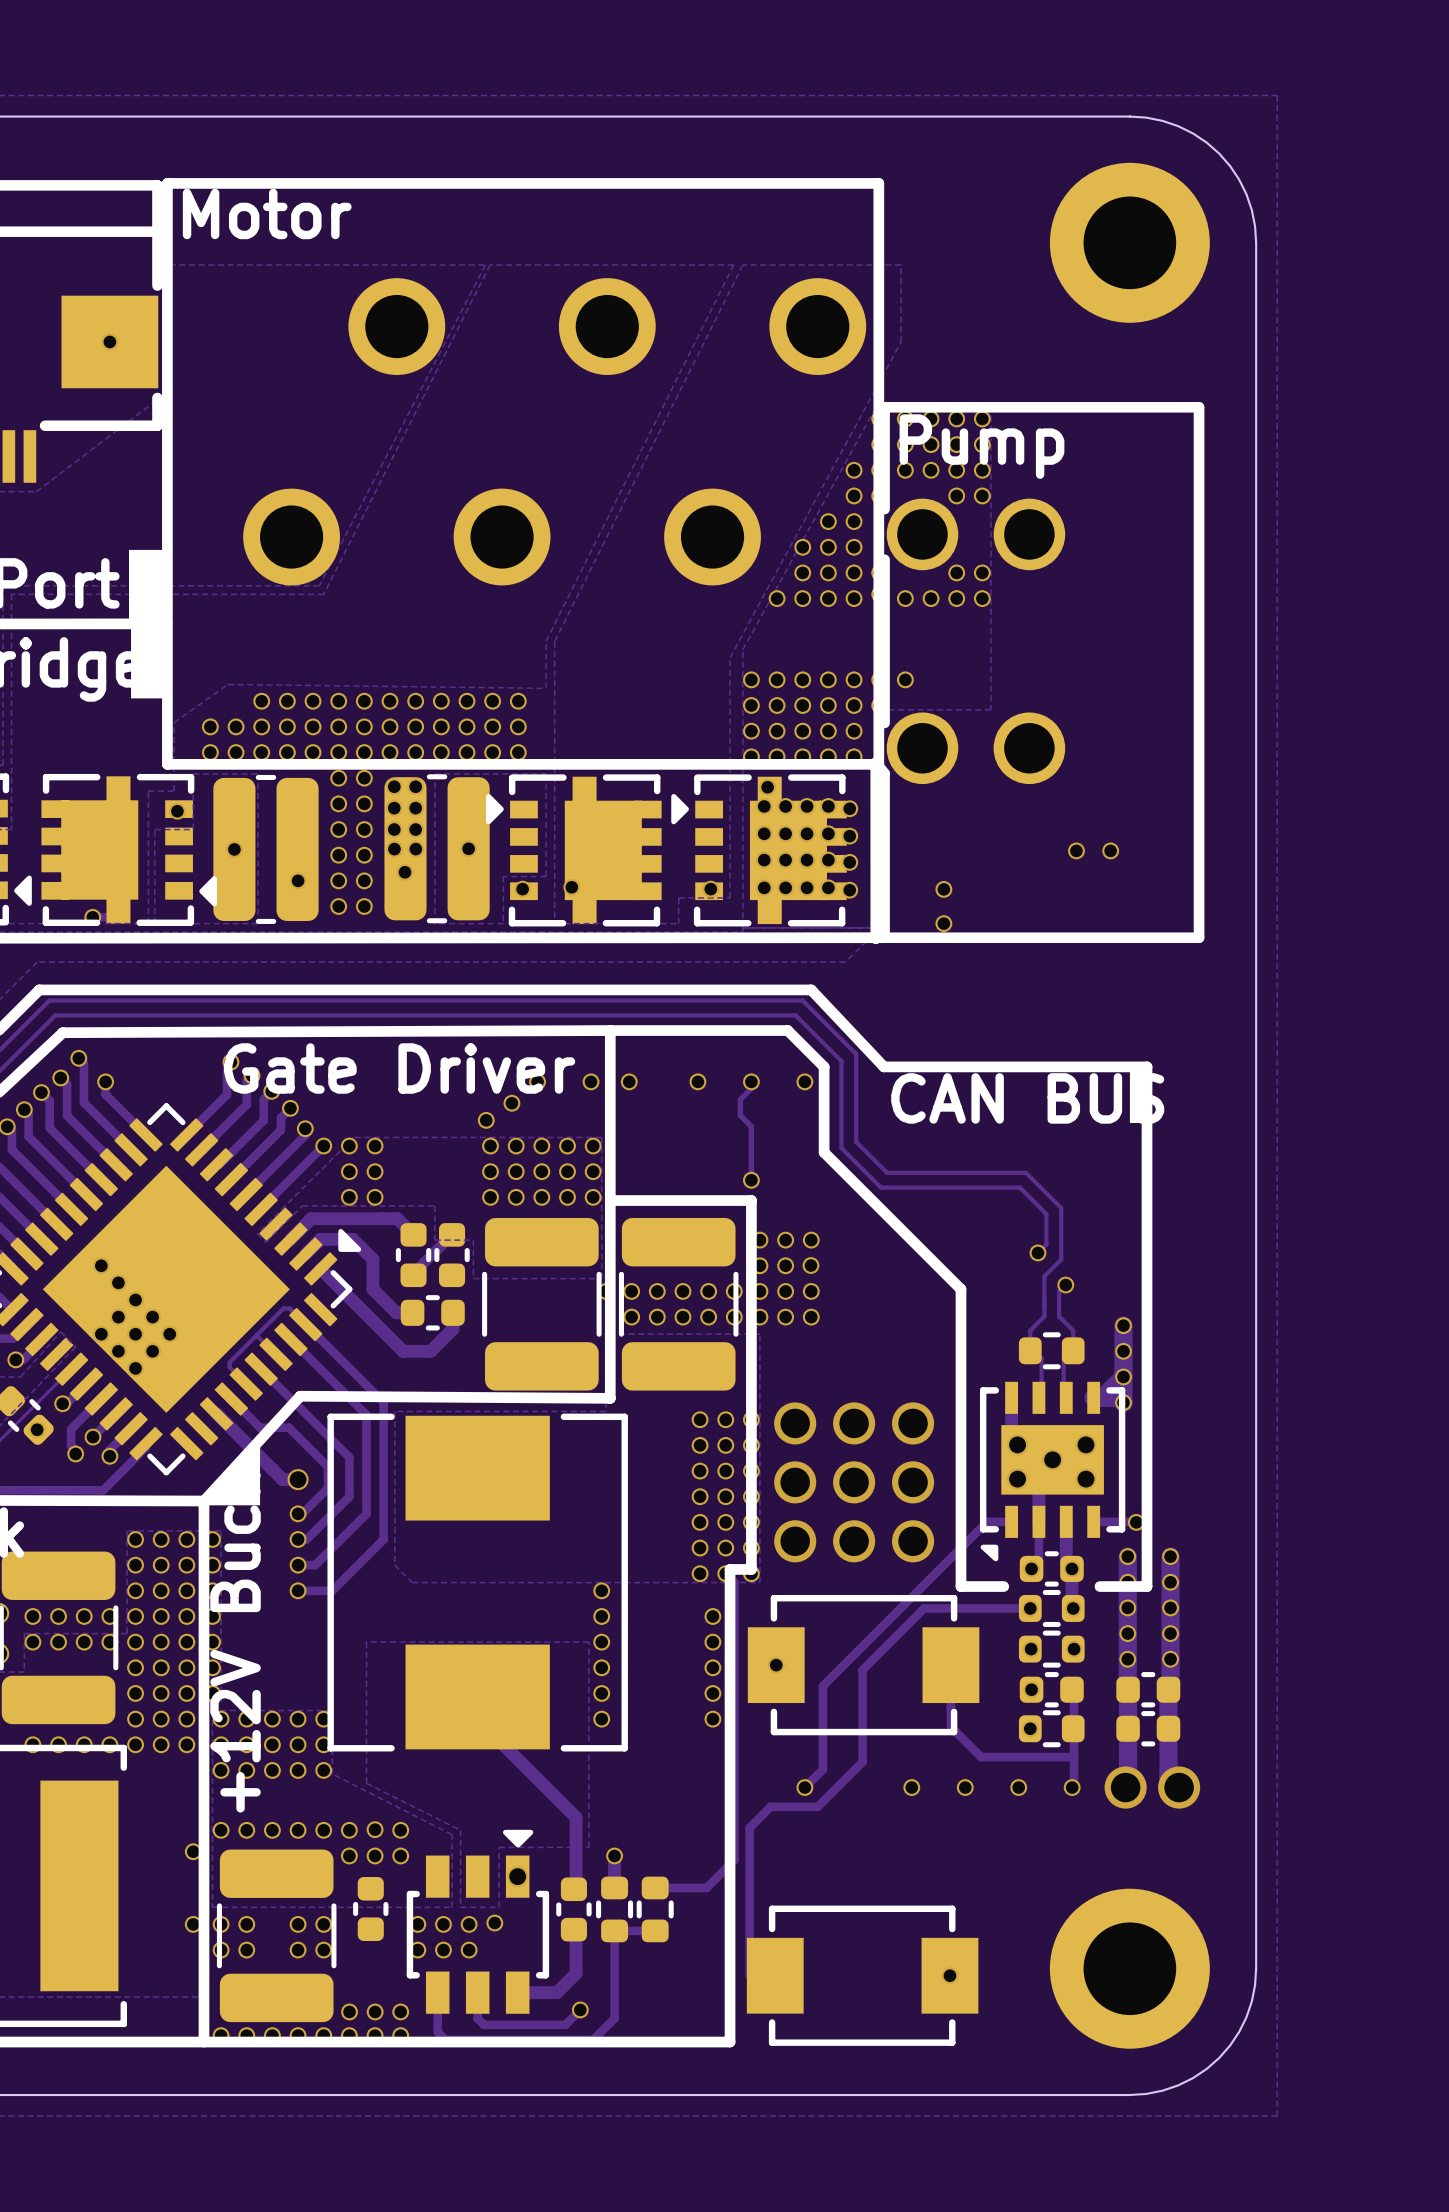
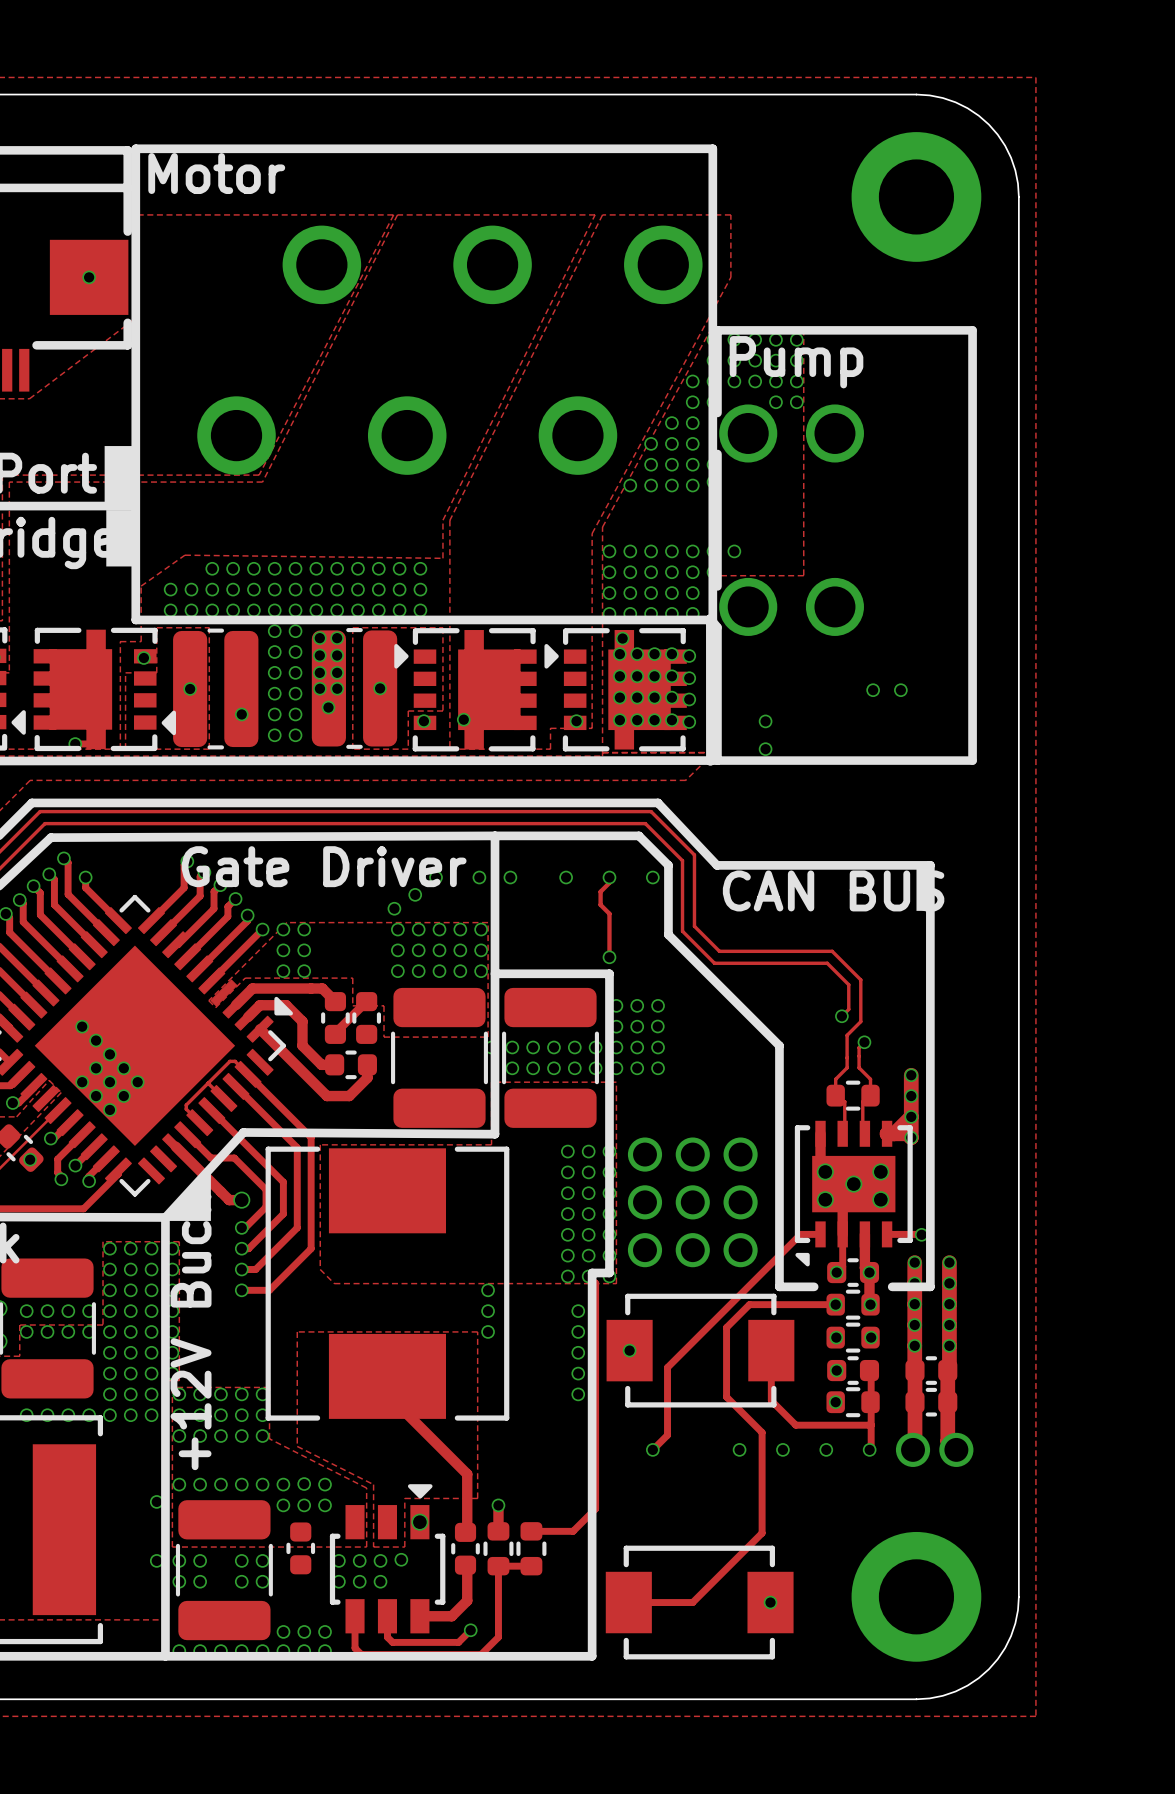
via: (956, 572) -> none
via: (982, 572) -> none
via: (905, 598) -> none
via: (931, 598) -> none
via: (956, 598) -> none
via: (982, 598) -> none
track: (895, 1636) (862, 1669) (862, 1761) (817, 1806) (770, 1806) (749, 1827) (749, 1975) -> (726, 1327) (726, 1396) (762, 1432) (762, 1533) (692, 1602) (628, 1602)
via: (601, 1667) -> none
via: (601, 1693) -> none
via: (601, 1719) -> none

